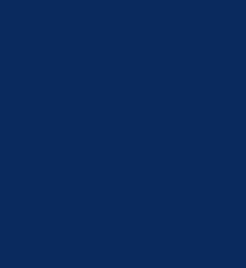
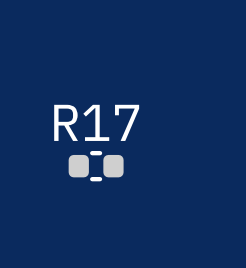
R17: none -> (96, 166)

